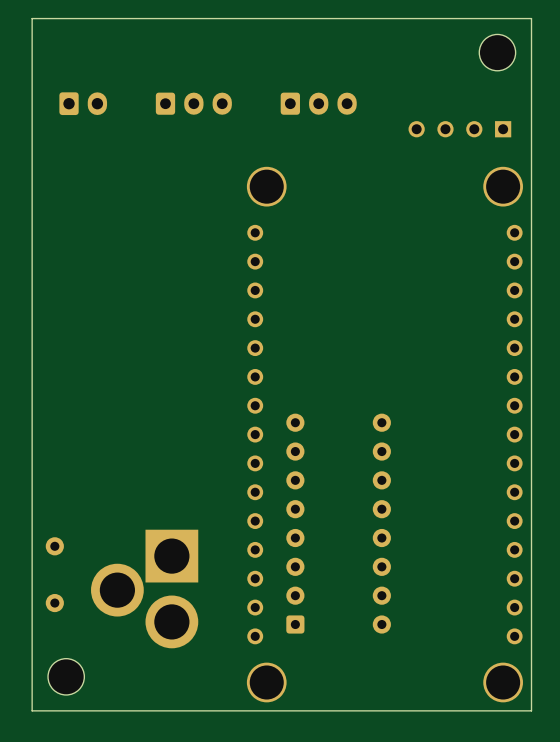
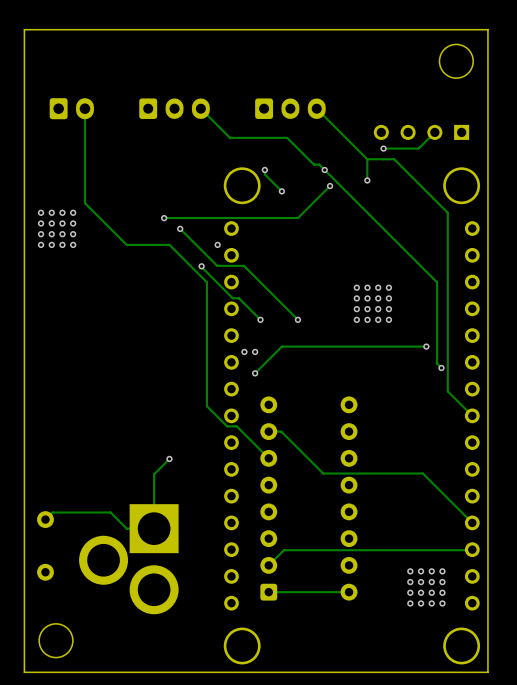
track: none -> (84, 108) (84, 203) (126, 244) (169, 244) (206, 282) (206, 406) (227, 426) (236, 426) (268, 458)
track: none -> (200, 108) (230, 137) (287, 137) (314, 164) (319, 164) (437, 282) (437, 363) (441, 367)
track: none -> (316, 108) (367, 159)
track: none -> (434, 132) (418, 148) (383, 148)
via: none -> (383, 148)
track: none -> (367, 159) (367, 180)
track: none -> (367, 159) (394, 159) (447, 212) (447, 391) (472, 415)
track: none -> (264, 169) (264, 174) (281, 191)
via: none -> (264, 169)
via: none -> (324, 169)
via: none -> (367, 180)
track: none -> (330, 186) (298, 218) (164, 218)
via: none -> (330, 186)
via: none -> (281, 191)
via: none -> (41, 212)
via: none -> (51, 212)
via: none -> (62, 212)
via: none -> (73, 212)
via: none -> (164, 218)
via: none -> (41, 223)
via: none -> (51, 223)
via: none -> (62, 223)
via: none -> (73, 223)
track: none -> (180, 228) (217, 265) (243, 265) (297, 319)
via: none -> (180, 228)
via: none -> (41, 234)
via: none -> (51, 234)
via: none -> (62, 234)
via: none -> (73, 234)
via: none -> (41, 244)
via: none -> (51, 244)
via: none -> (62, 244)
via: none -> (73, 244)
via: none -> (217, 244)
track: none -> (201, 266) (232, 298) (238, 298) (260, 319)
via: none -> (201, 266)
via: none -> (356, 287)
via: none -> (367, 287)
via: none -> (378, 287)
via: none -> (388, 287)
via: none -> (356, 298)
via: none -> (367, 298)
via: none -> (378, 298)
via: none -> (388, 298)
via: none -> (356, 309)
via: none -> (367, 309)
via: none -> (378, 309)
via: none -> (388, 309)
via: none -> (260, 319)
via: none -> (297, 319)
via: none -> (356, 319)
via: none -> (367, 319)
via: none -> (378, 319)
via: none -> (388, 319)
track: none -> (426, 346) (281, 346) (255, 373)
via: none -> (426, 346)
via: none -> (244, 351)
via: none -> (255, 351)
via: none -> (441, 367)
via: none -> (255, 373)
track: none -> (268, 431) (281, 431) (323, 473) (422, 473) (472, 522)
track: none -> (169, 458) (154, 474) (154, 528) (126, 528) (110, 512) (52, 512) (45, 519)
via: none -> (169, 458)
track: none -> (472, 549) (283, 550) (268, 565)
via: none -> (410, 571)
via: none -> (421, 571)
via: none -> (431, 571)
via: none -> (442, 571)
via: none -> (410, 582)
via: none -> (421, 582)
via: none -> (431, 582)
via: none -> (442, 582)
track: none -> (349, 592) (268, 592)
via: none -> (410, 592)
via: none -> (421, 592)
via: none -> (431, 592)
via: none -> (442, 592)
via: none -> (410, 603)
via: none -> (421, 603)
via: none -> (431, 603)
via: none -> (442, 603)

